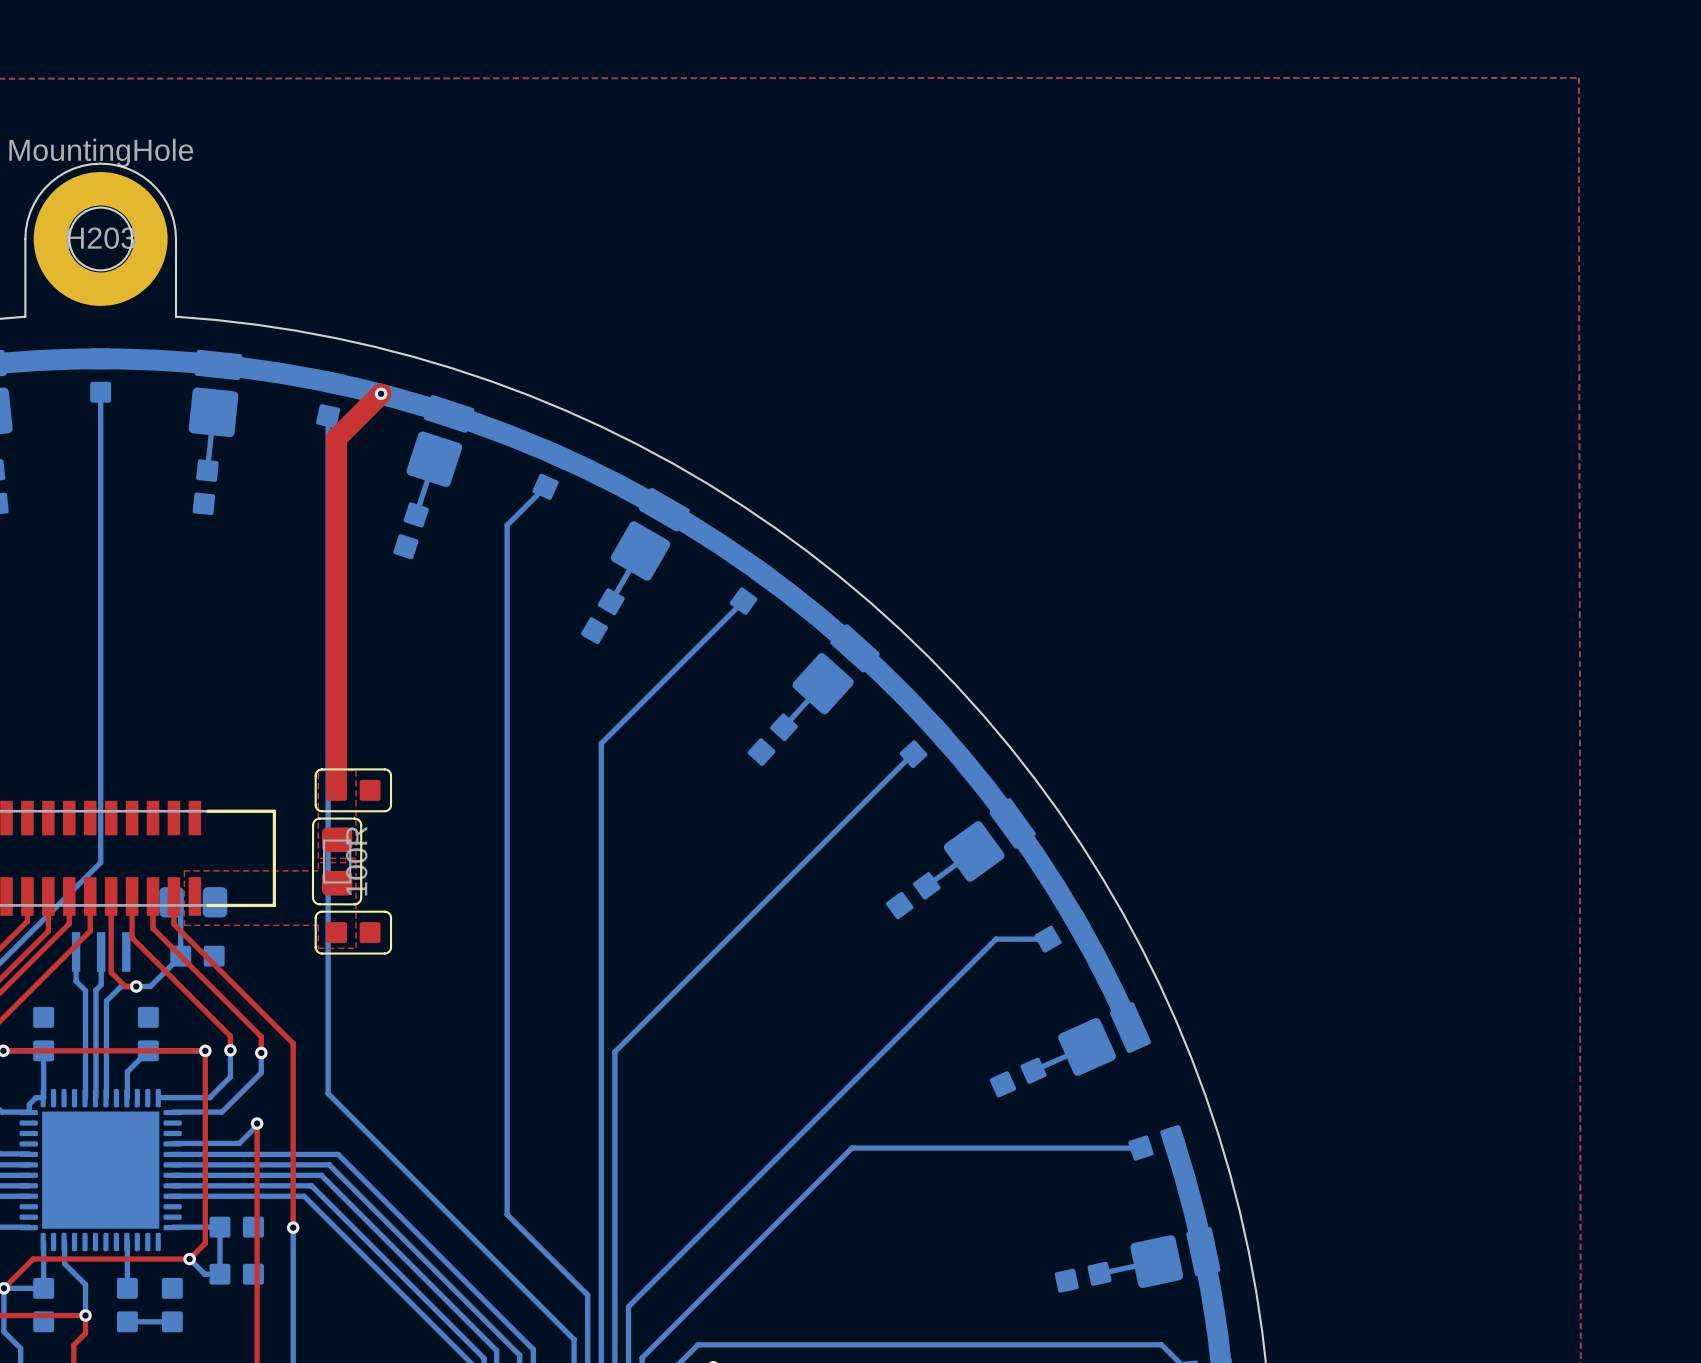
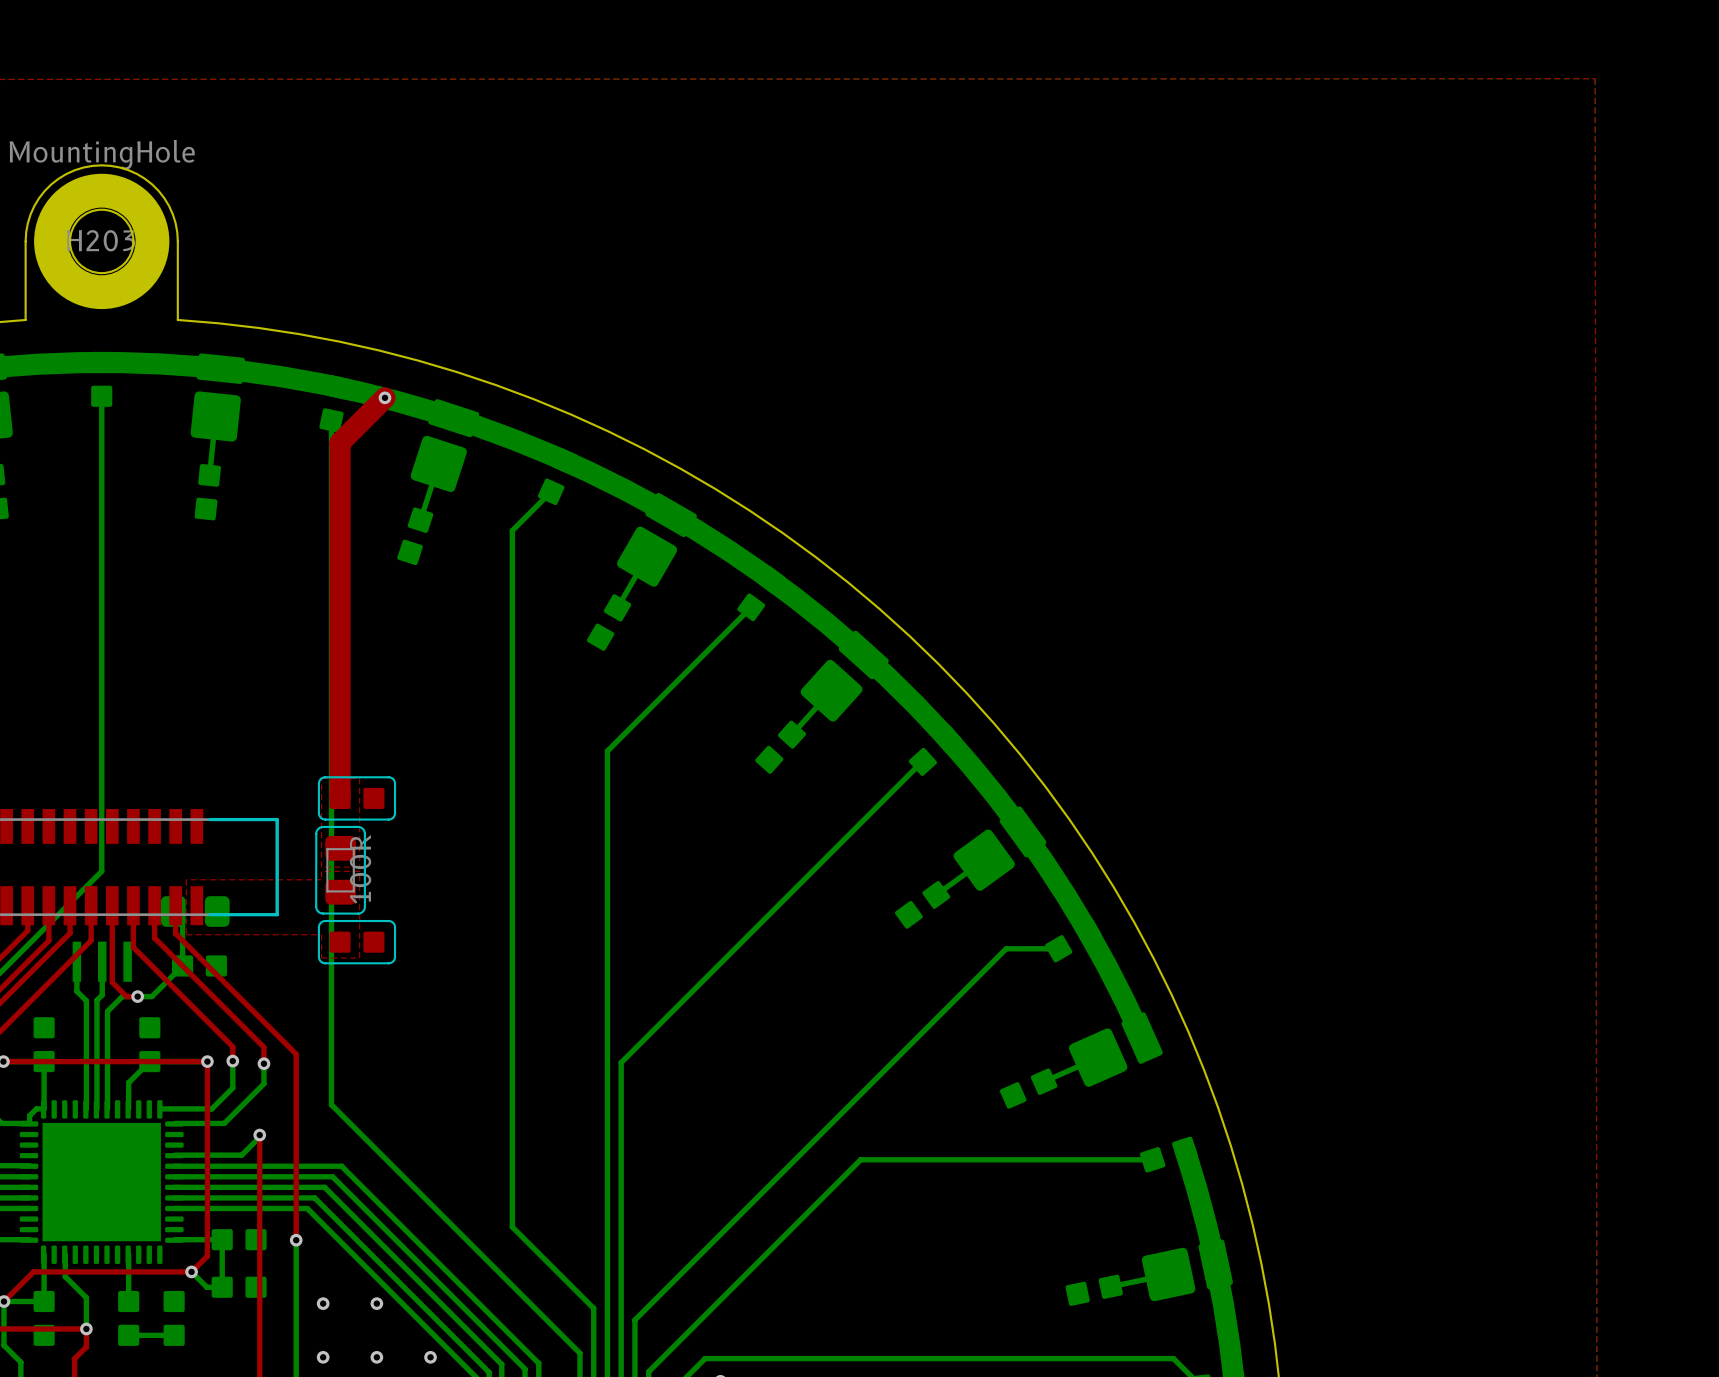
via: none -> (323, 1303)
via: none -> (376, 1303)
via: none -> (323, 1357)
via: none -> (376, 1357)
via: none -> (430, 1357)

